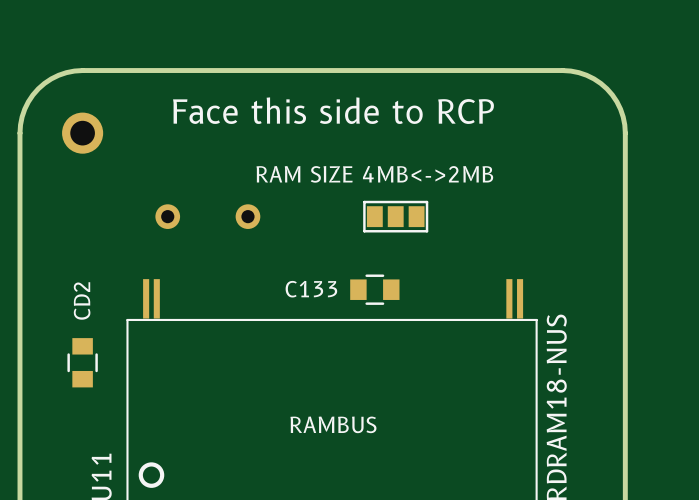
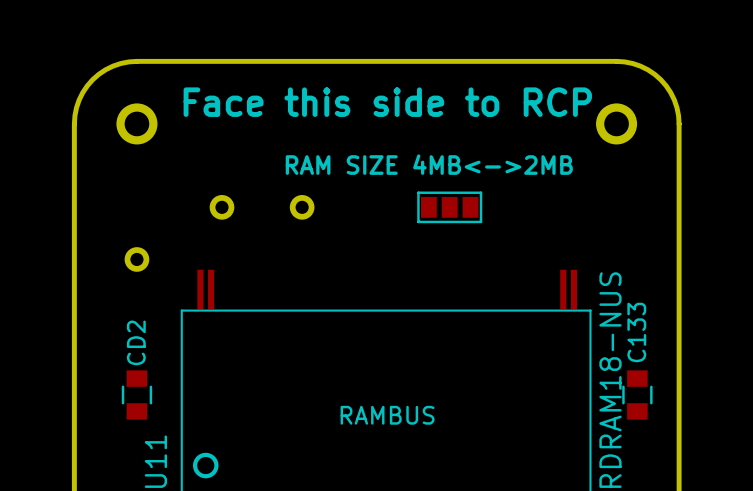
part: none -> (616, 123)
part: none -> (136, 259)
C133 rotation: 0° (374, 289) -> 90° clockwise (637, 395)
C133 position: (374, 289) -> (637, 395)
CD2 name position: CD2 (82, 300) -> CD2 (136, 342)
CD2 position: (82, 362) -> (136, 395)

